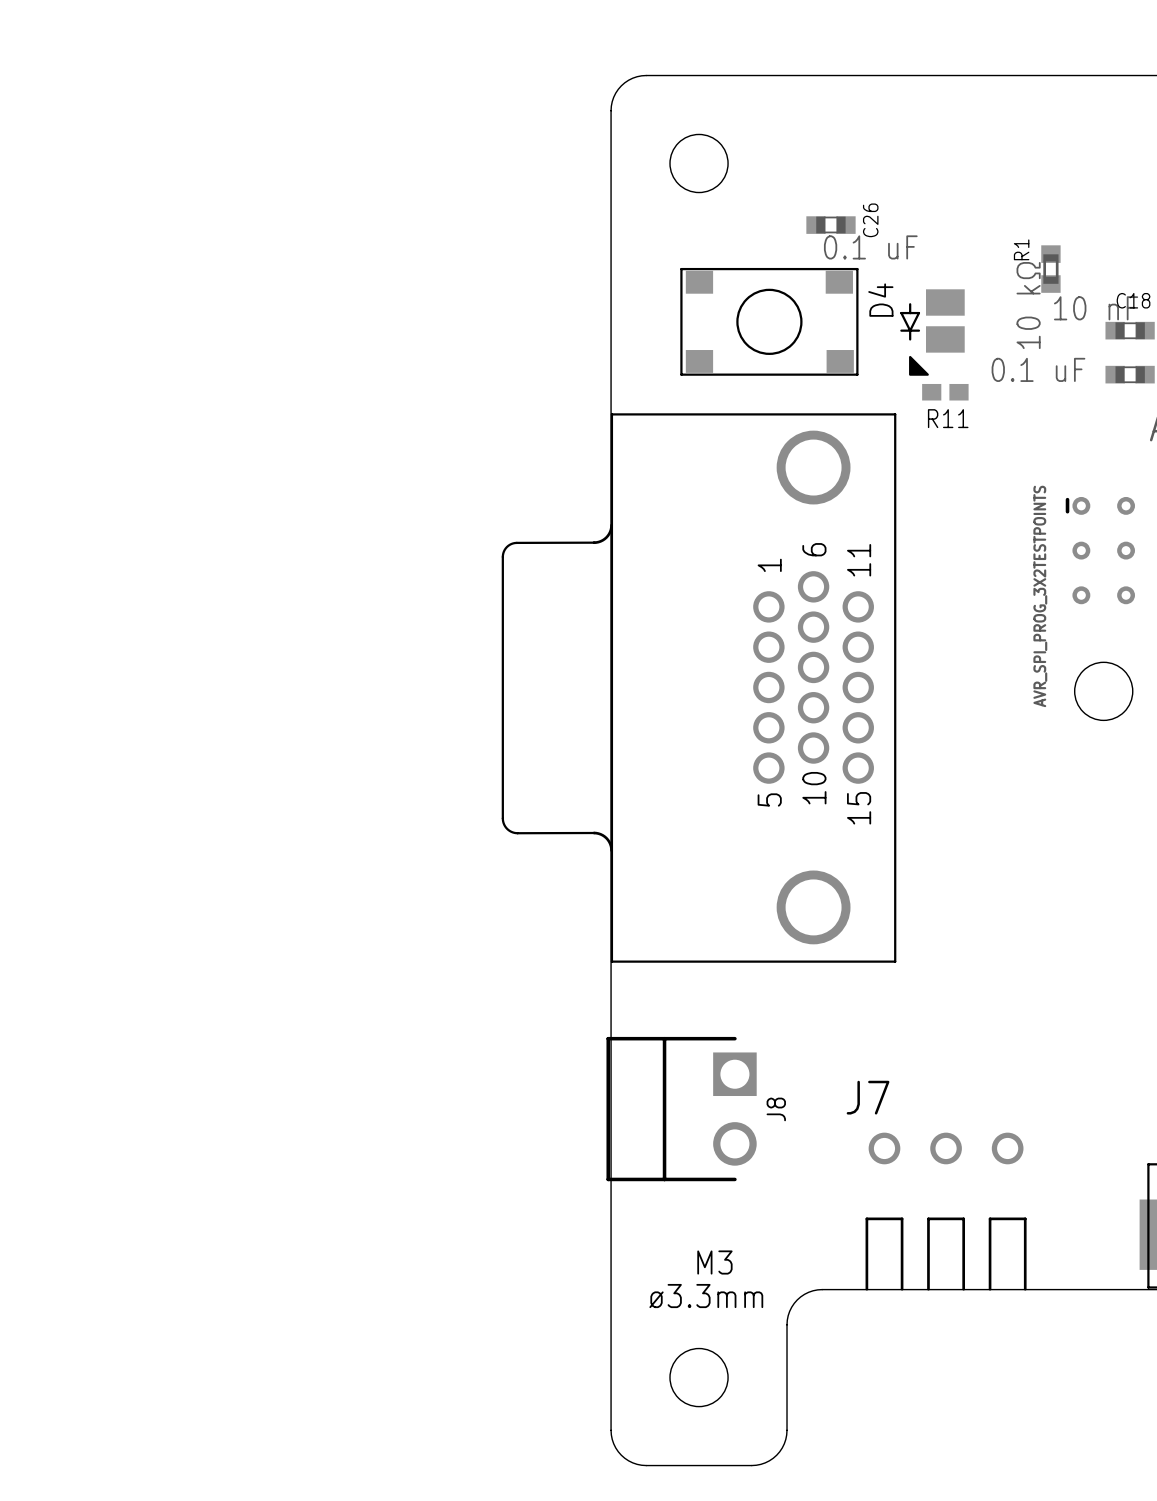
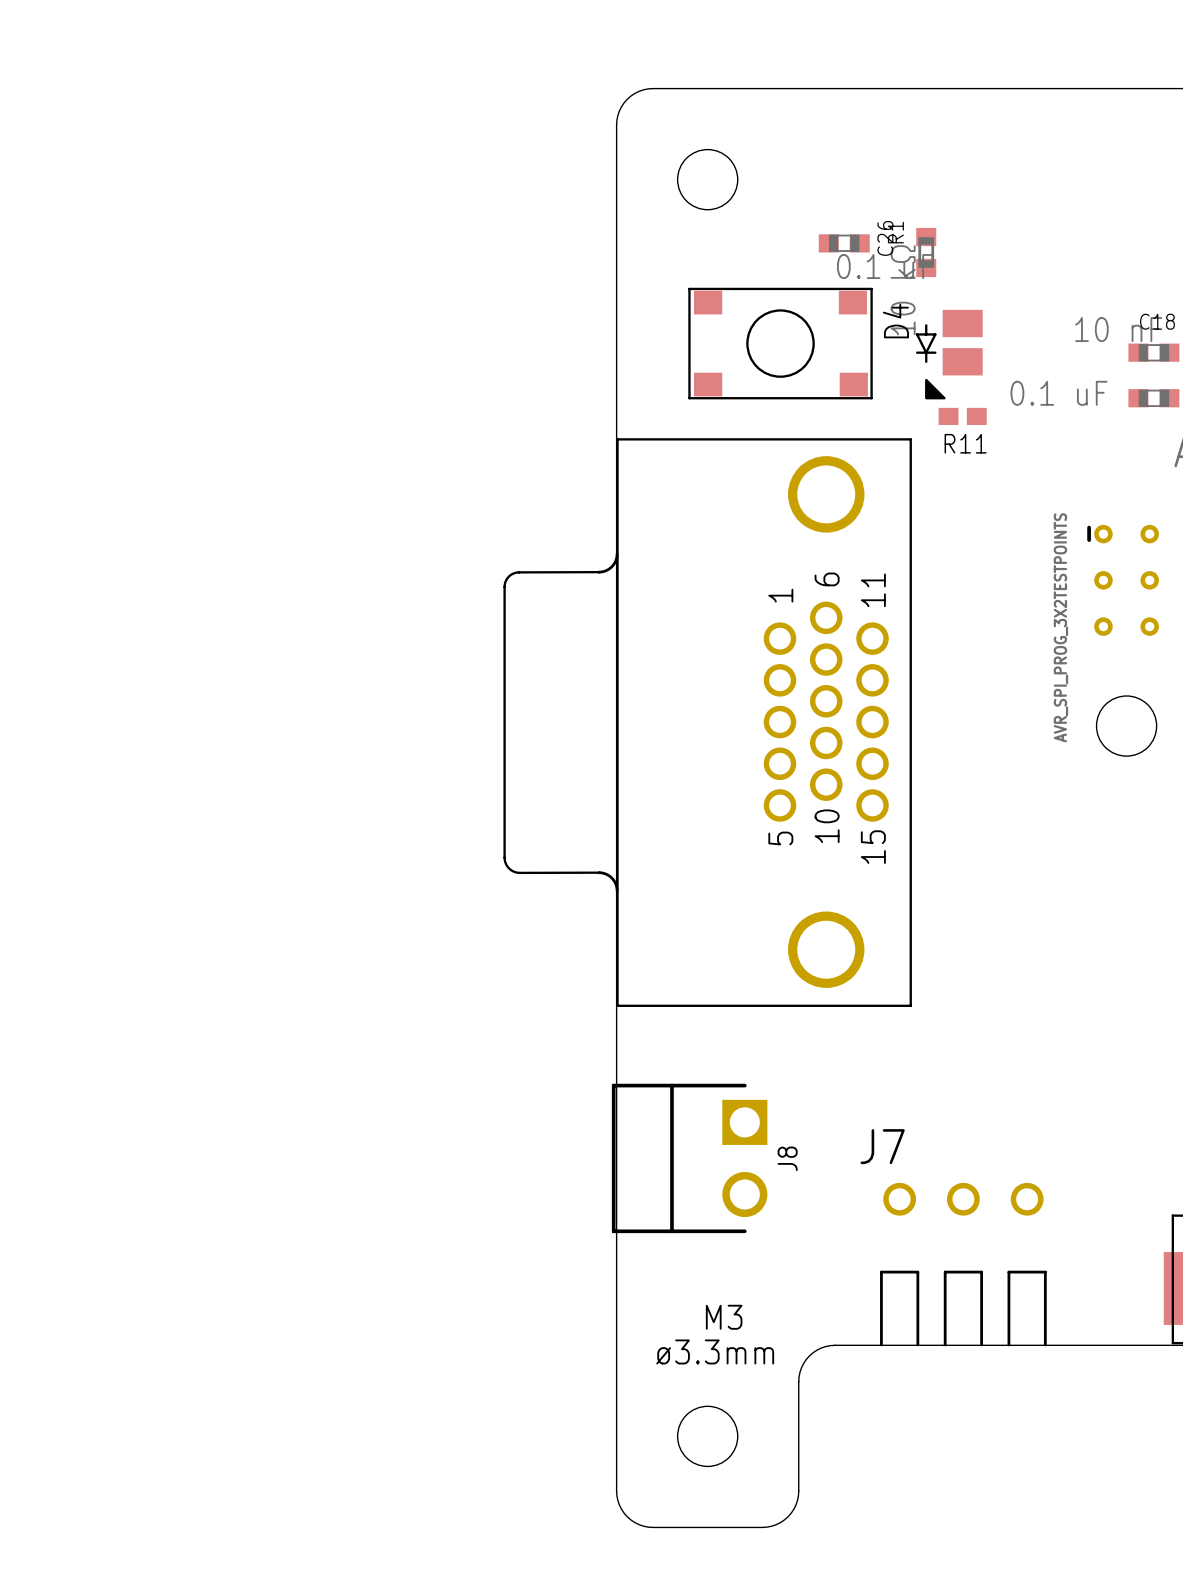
R1 position: (1050, 269) -> (926, 252)

